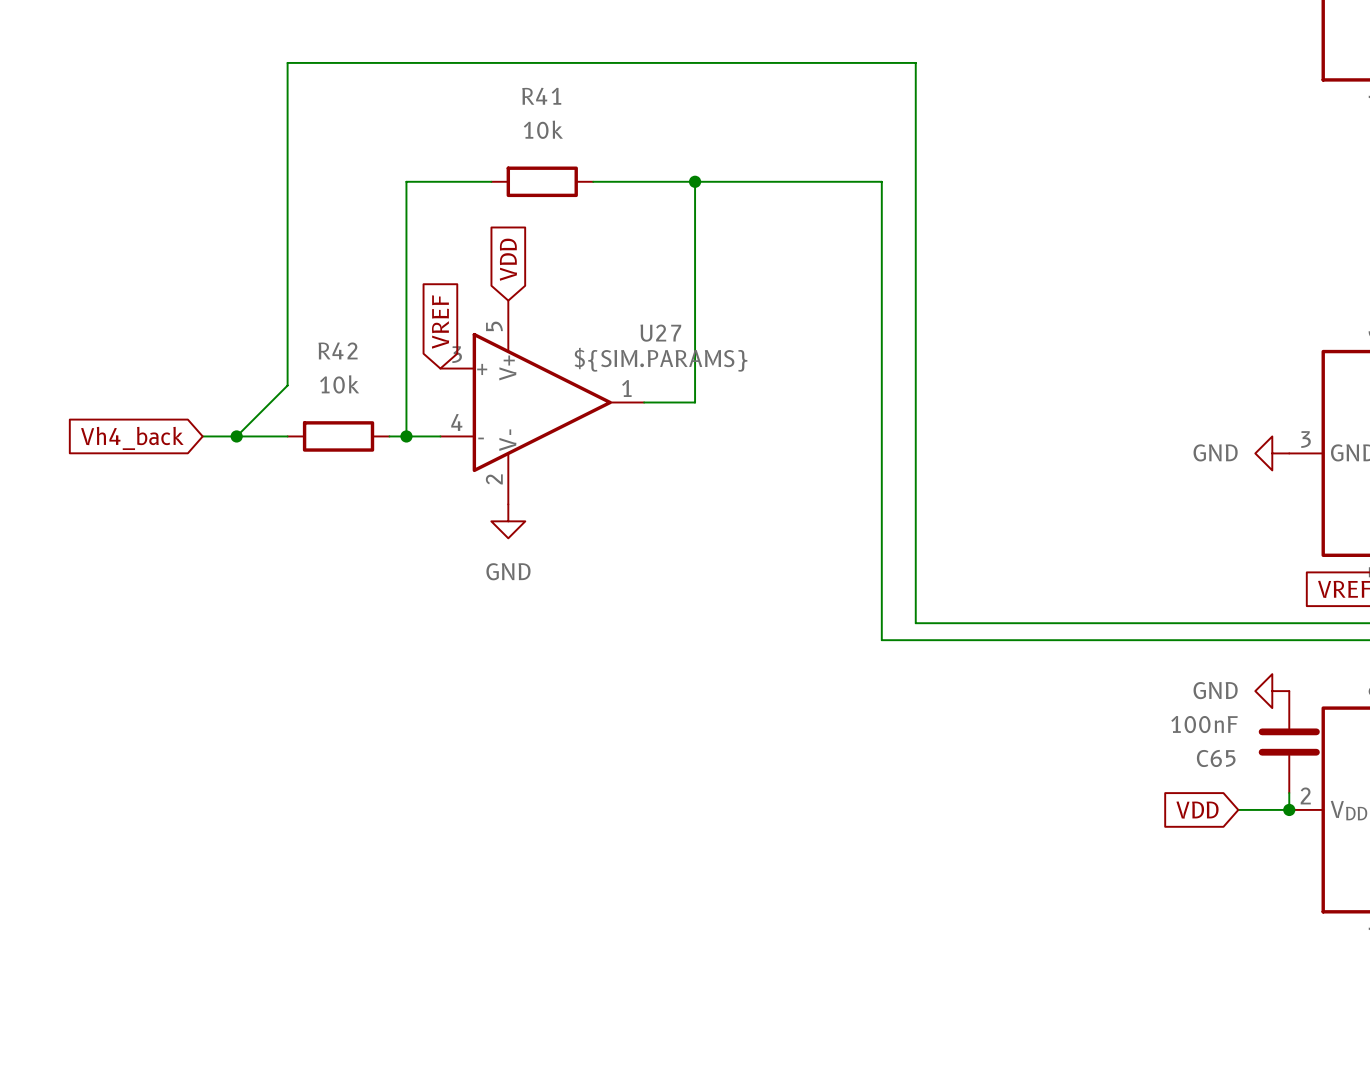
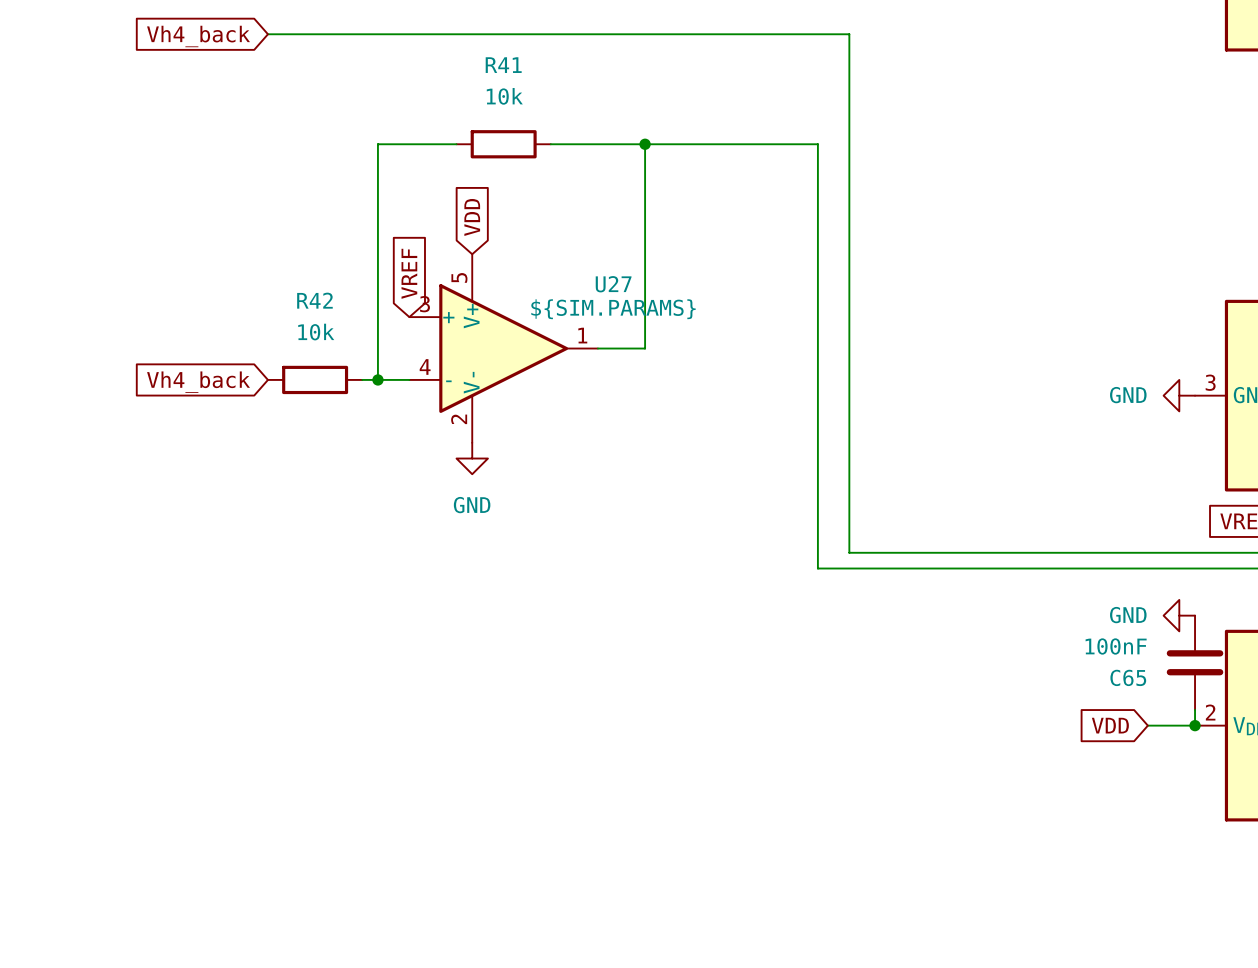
wire: (287, 62) (287, 385) (236, 436) -> none
global label: none -> Vh4_back (198, 36)
wire: (202, 436) (287, 436) -> none
junction: (236, 436) -> none
global label position: Vh4_back (132, 438) -> Vh4_back (198, 382)

